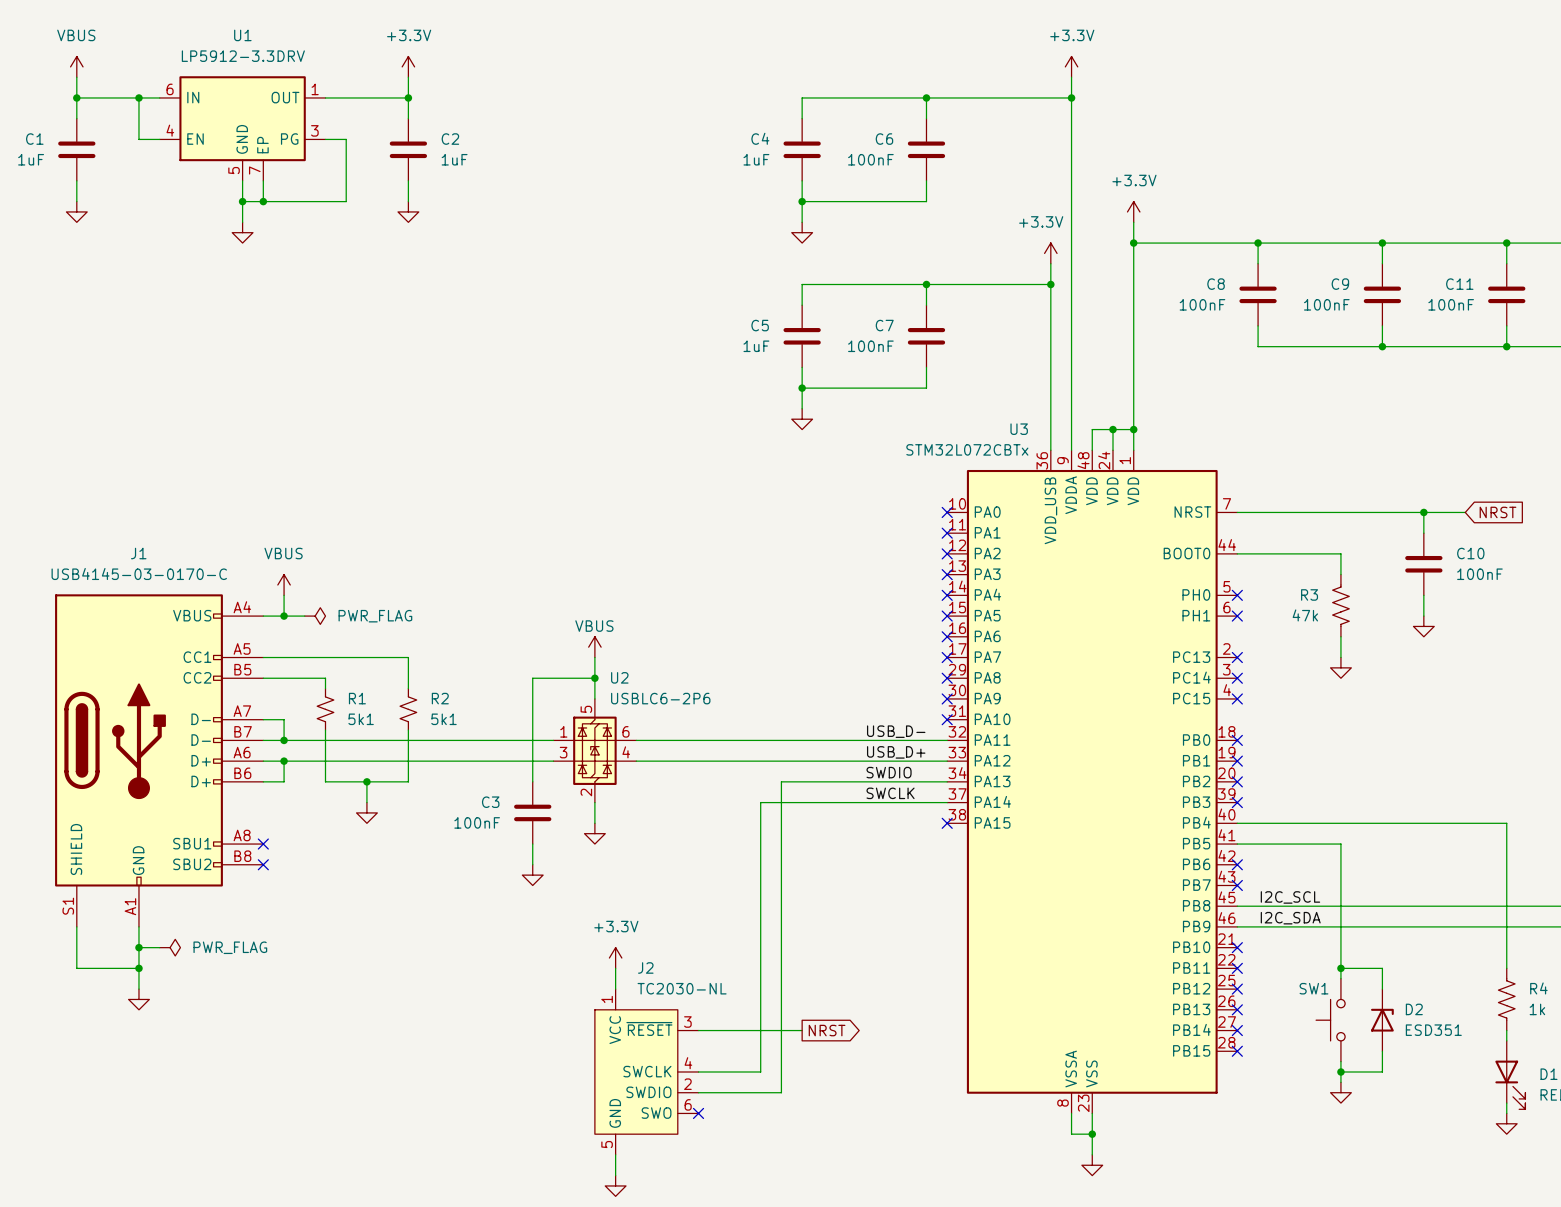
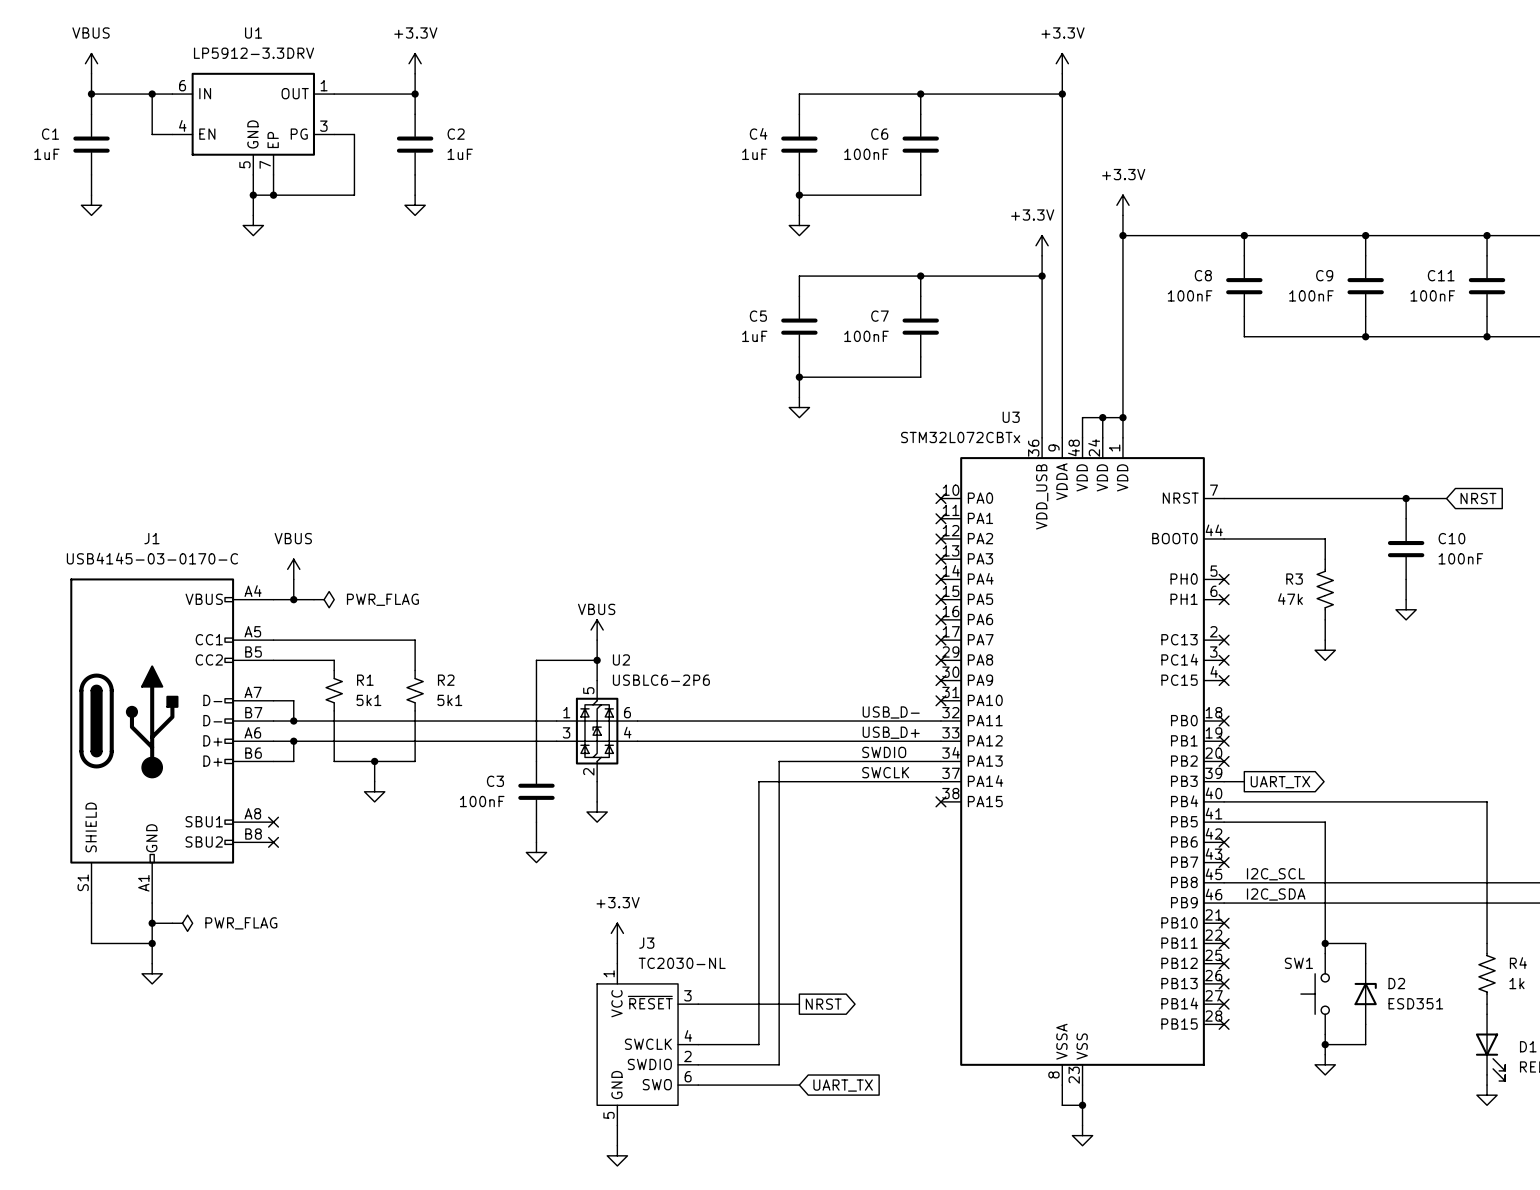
wire: none -> (1224, 781) (1244, 781)
no-connect mark: (1237, 802) -> none
global label: none -> UART_TX (1280, 782)
J2 name: J2 (645, 967) -> J3 (646, 943)
wire: none -> (698, 1085) (799, 1085)
no-connect mark: (698, 1113) -> none
global label: none -> UART_TX (843, 1085)

